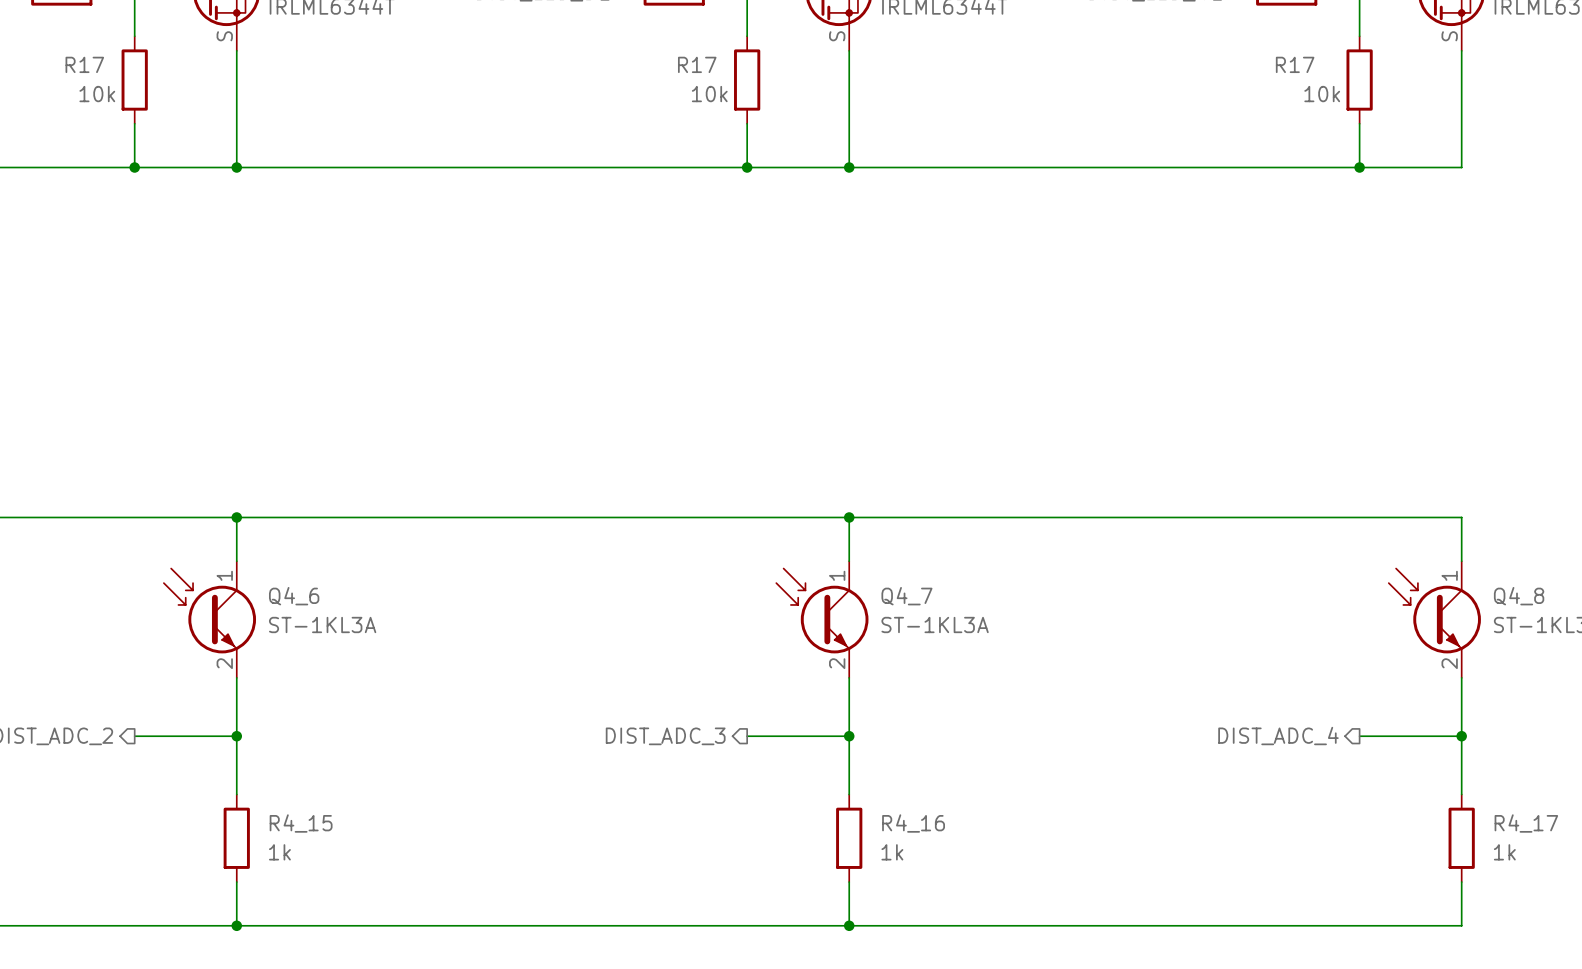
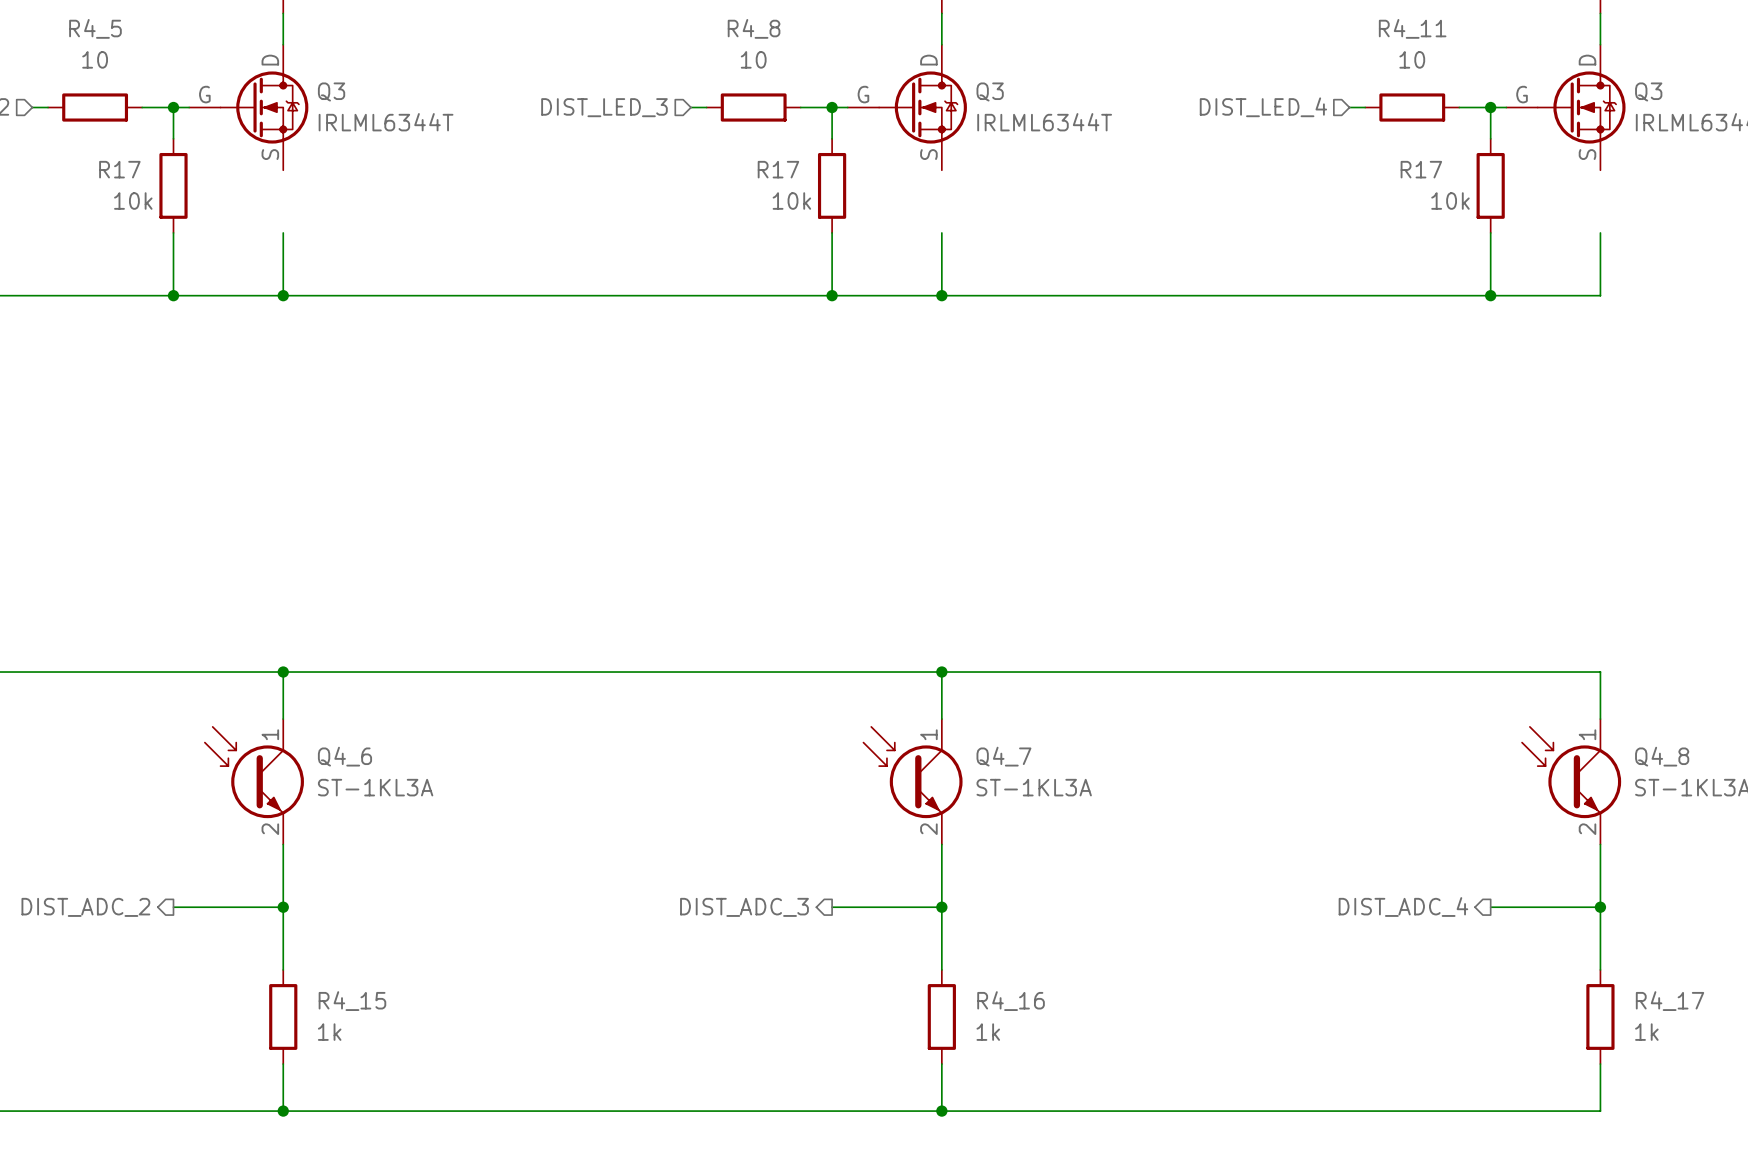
wire: (236, 50) (236, 109) -> none
wire: (849, 50) (849, 109) -> none
wire: (1461, 50) (1461, 109) -> none
R17 position: (134, 80) -> (173, 185)
R17 position: (747, 80) -> (832, 185)
R17 position: (1359, 80) -> (1490, 185)

